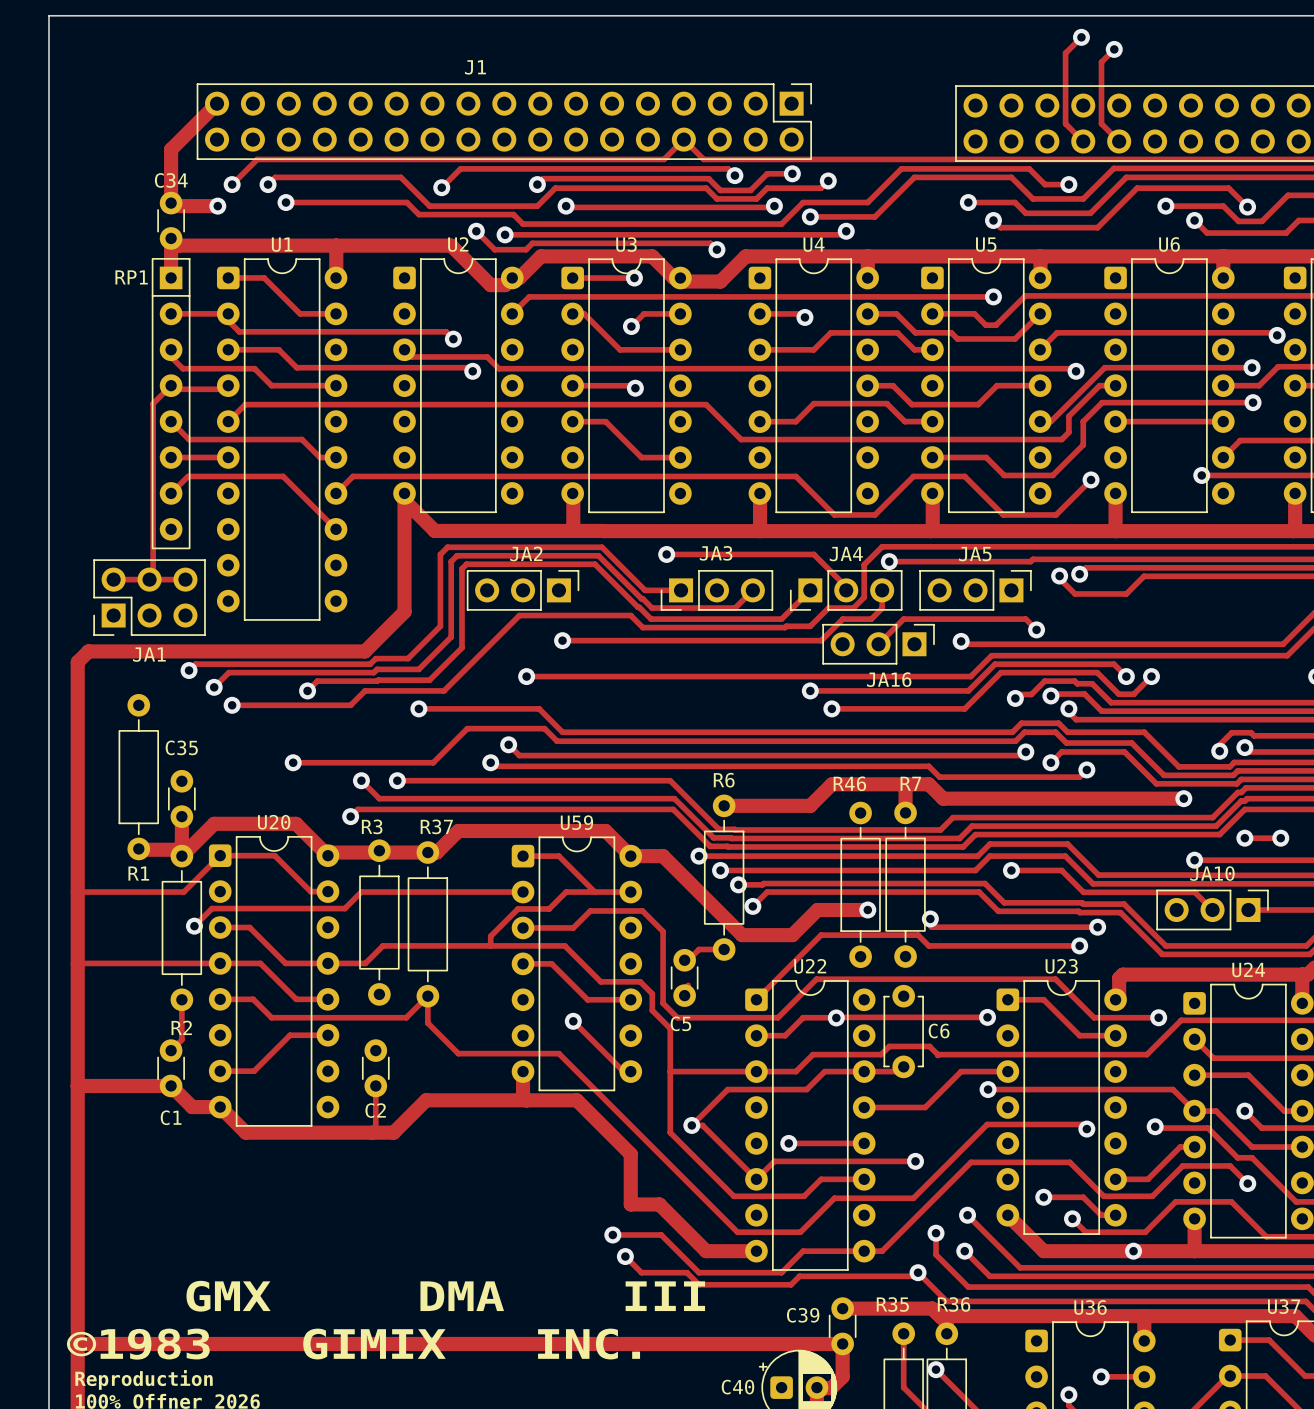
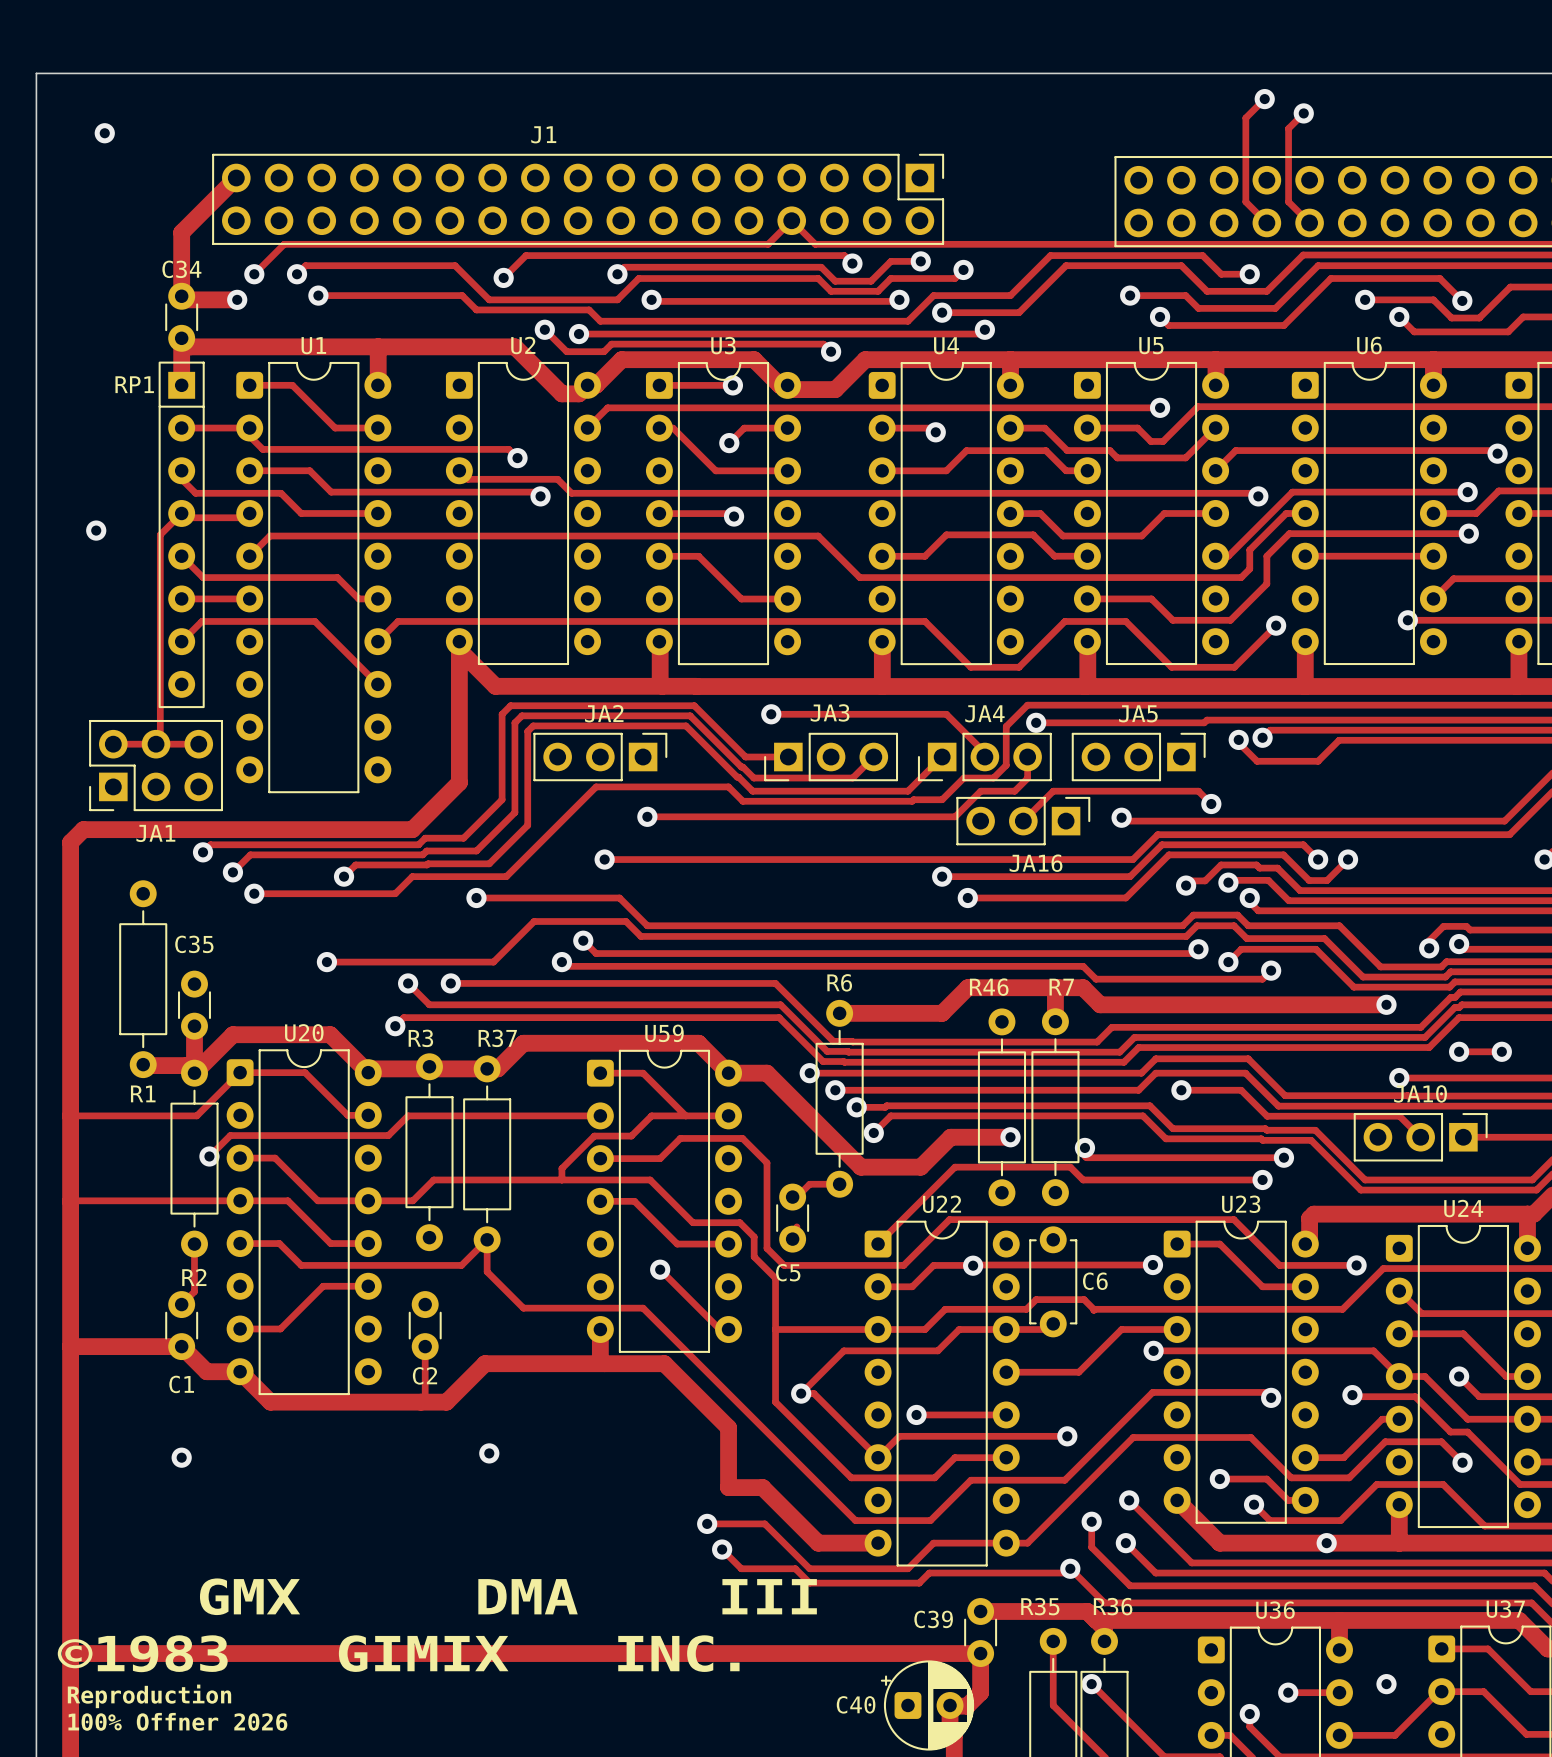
via: none -> (104, 133)
via: none -> (96, 530)
via: none -> (489, 1453)
via: none -> (181, 1457)
via: none -> (1386, 1684)

